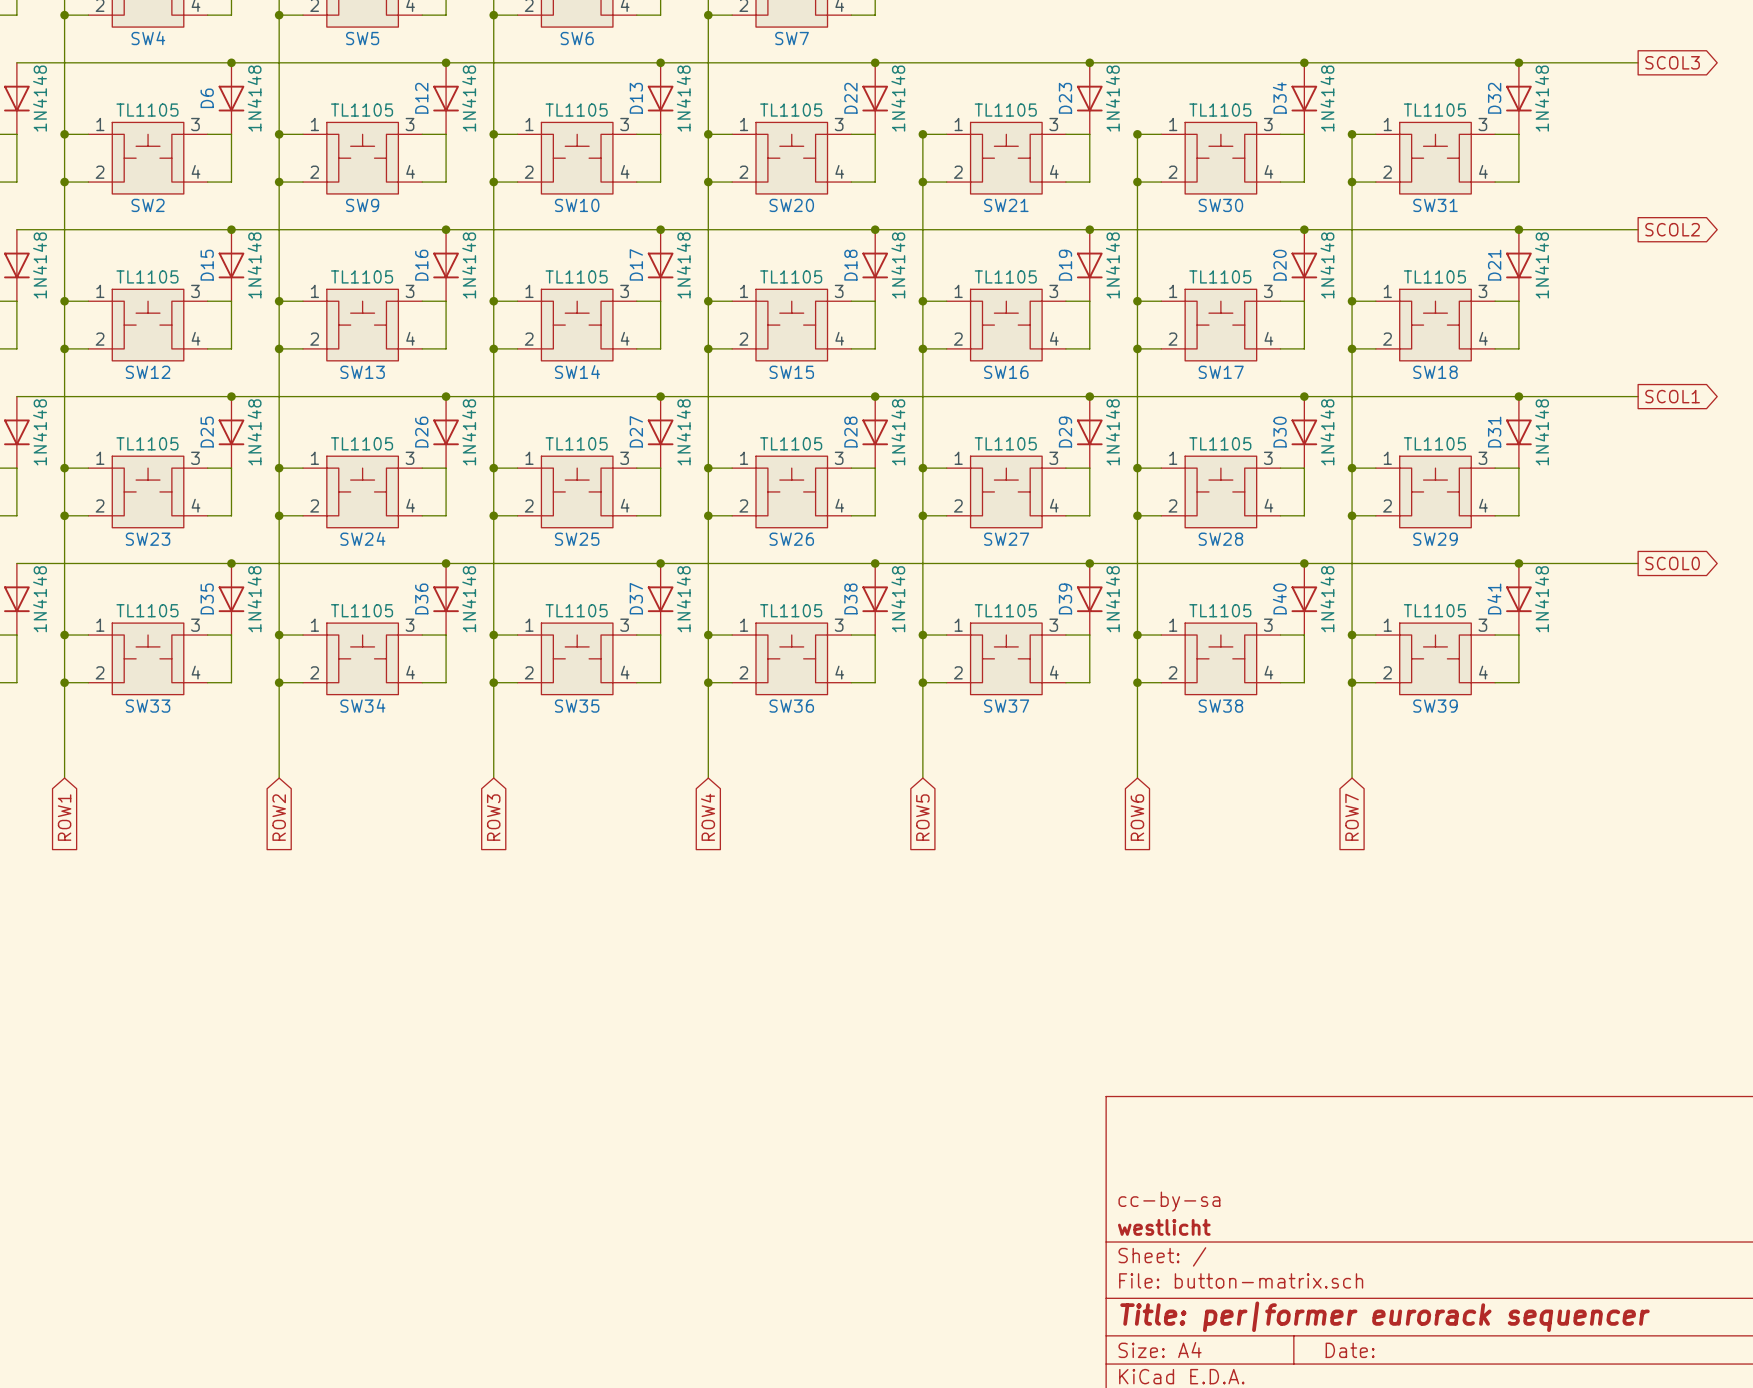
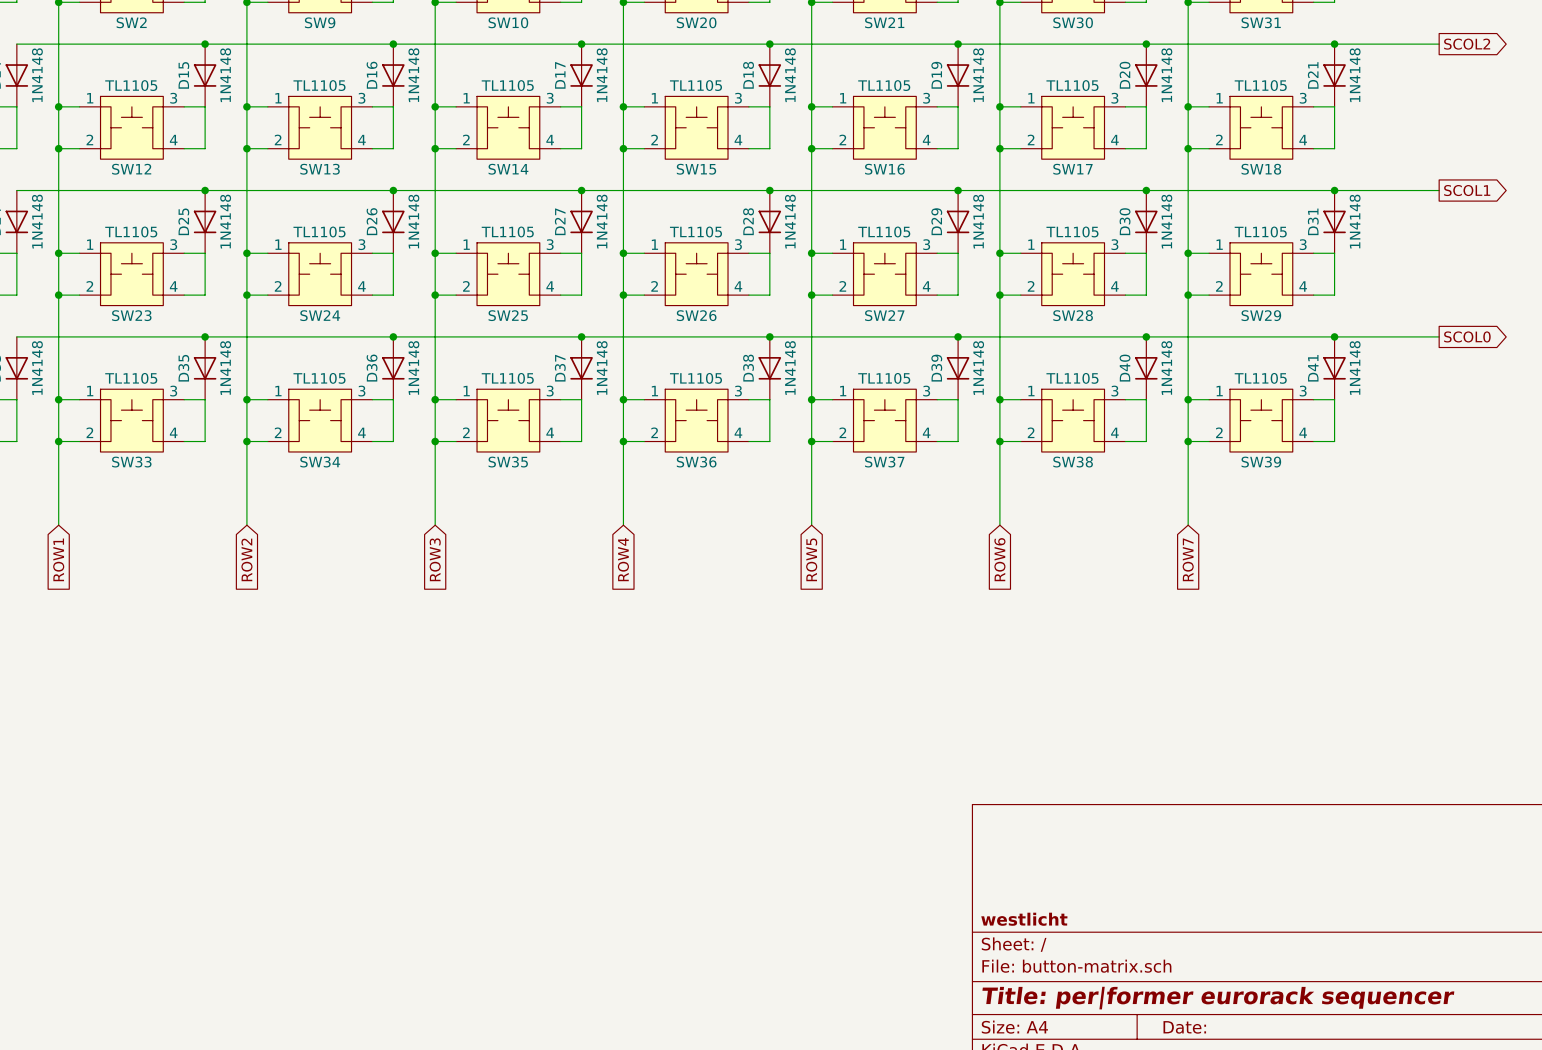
title block: cc-by-sa (1169, 1201) -> none

